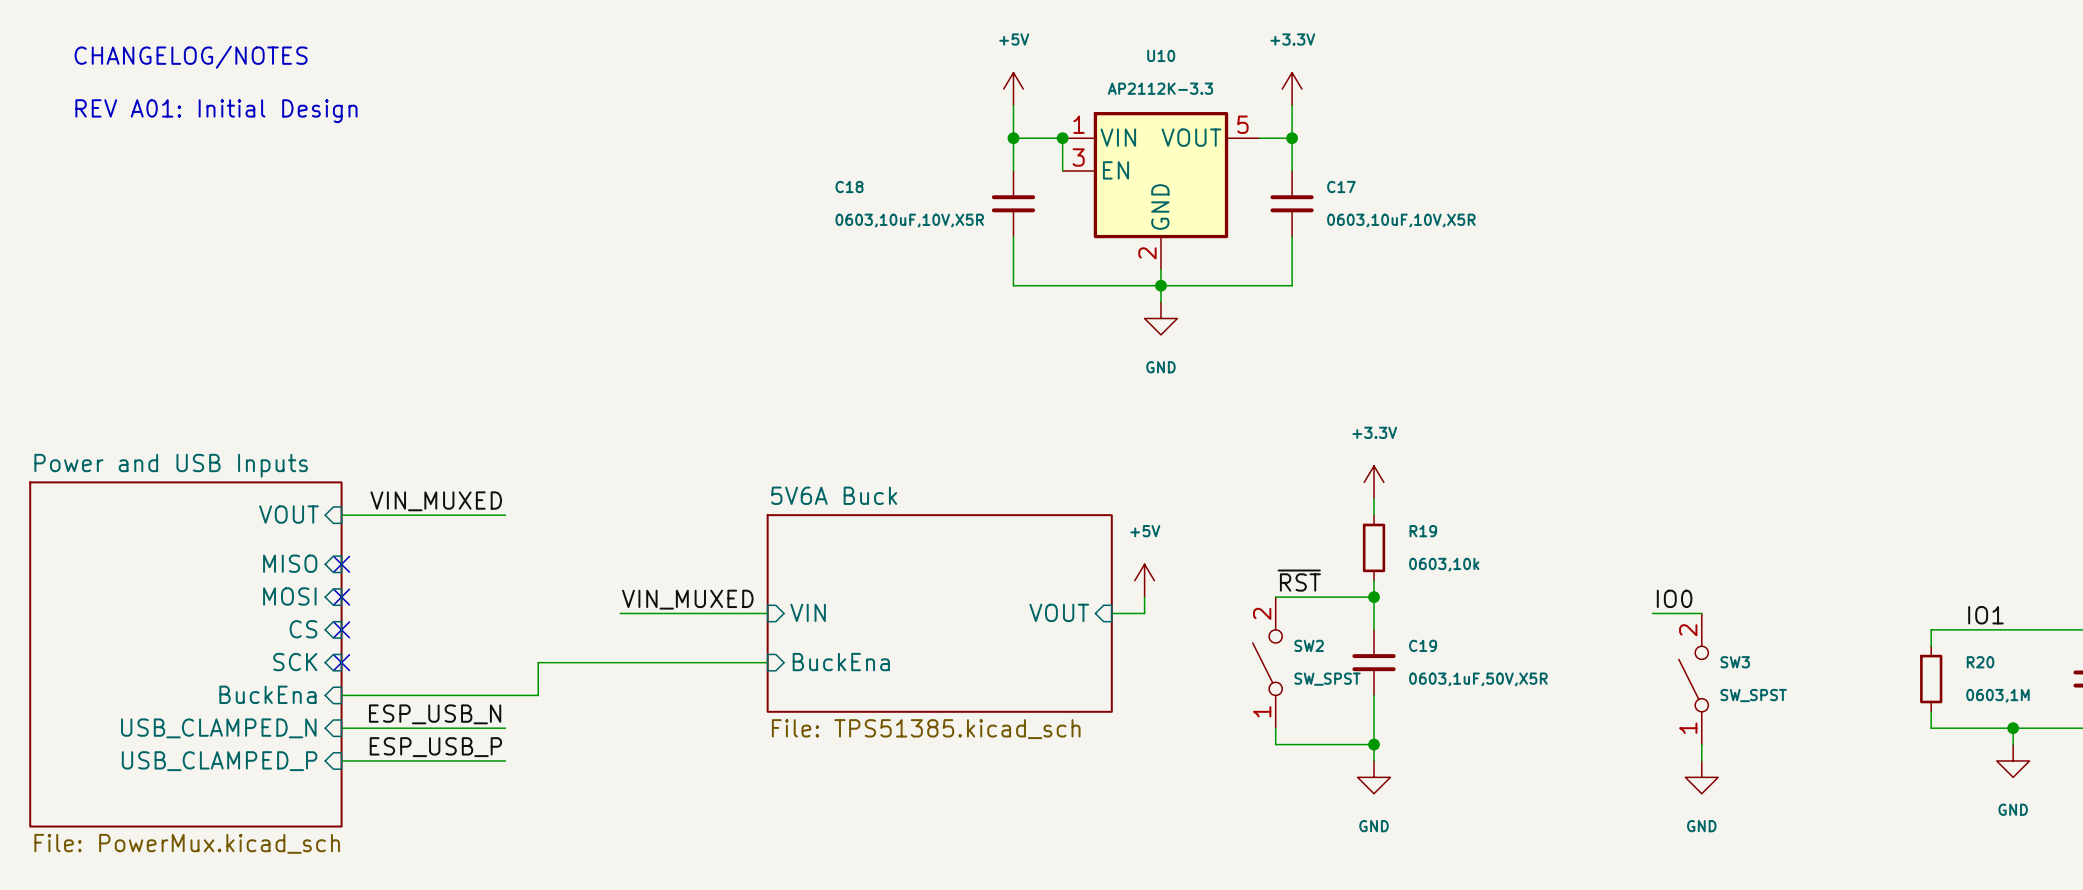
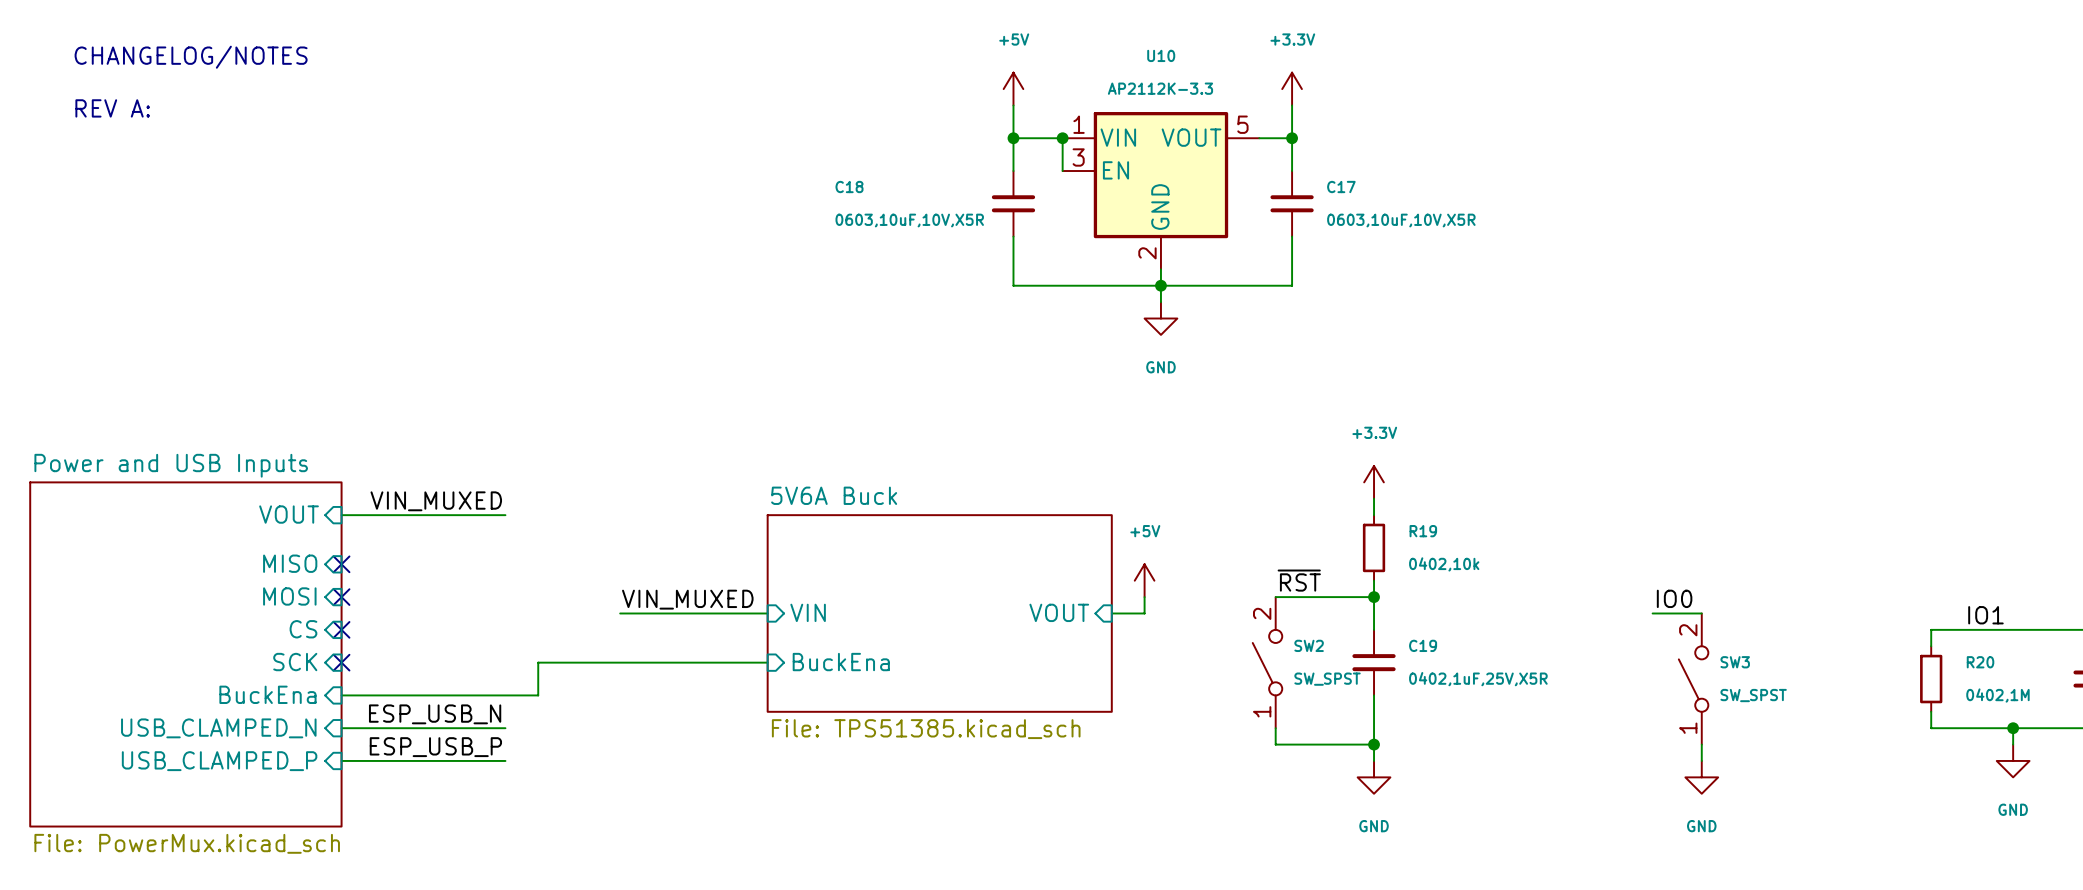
text: REV A01: Initial Design (216, 111) -> REV A: (112, 108)
R19 value: 0603,10k (1444, 564) -> 0402,10k (1444, 564)
C19 value: 0603,1uF,50V,X5R (1478, 679) -> 0402,1uF,25V,X5R (1478, 679)
R20 value: 0603,1M (1997, 695) -> 0402,1M (1997, 695)

